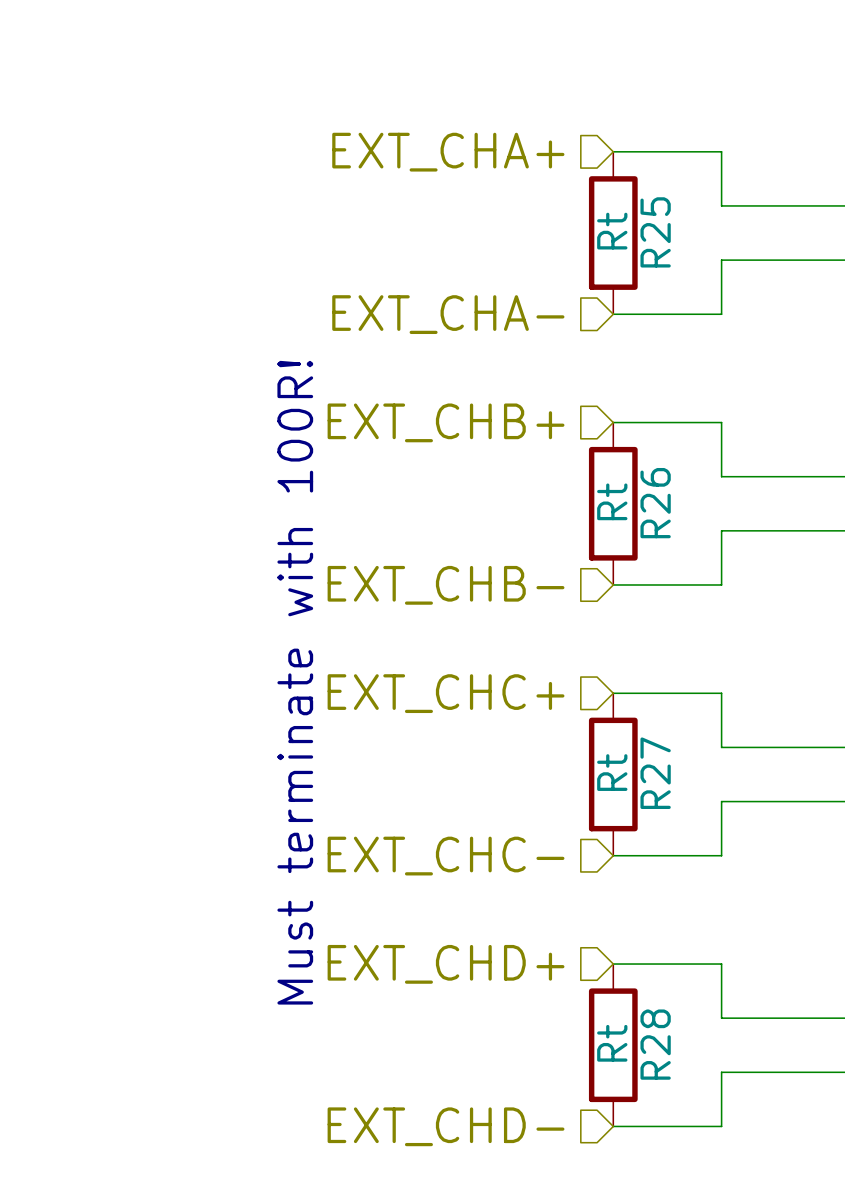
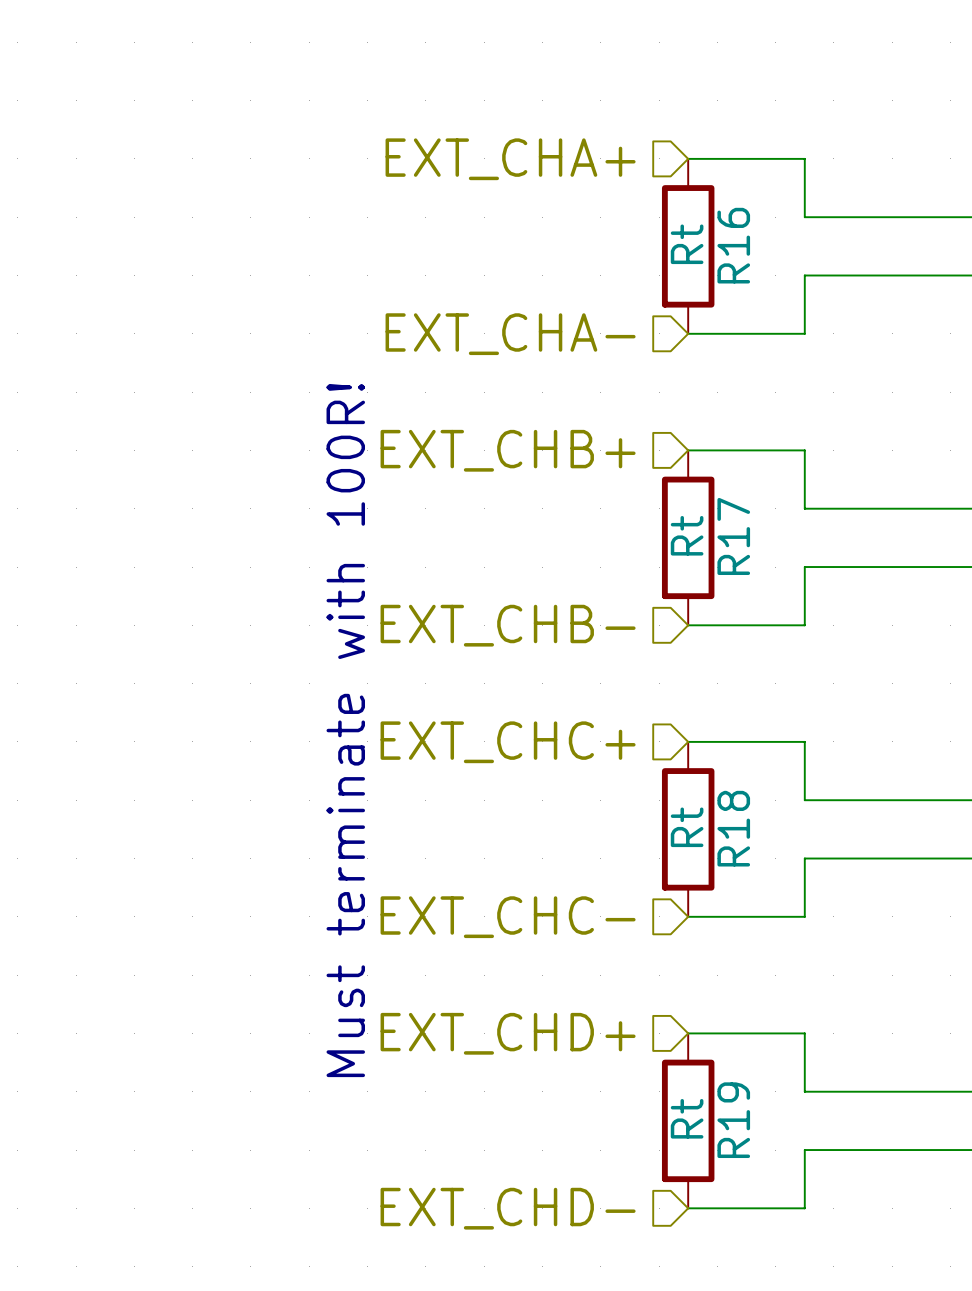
R25 name: R25 (655, 232) -> R16 (733, 245)
R26 name: R26 (655, 503) -> R17 (733, 536)
R27 name: R27 (655, 773) -> R18 (733, 828)
R28 name: R28 (655, 1044) -> R19 (733, 1120)

